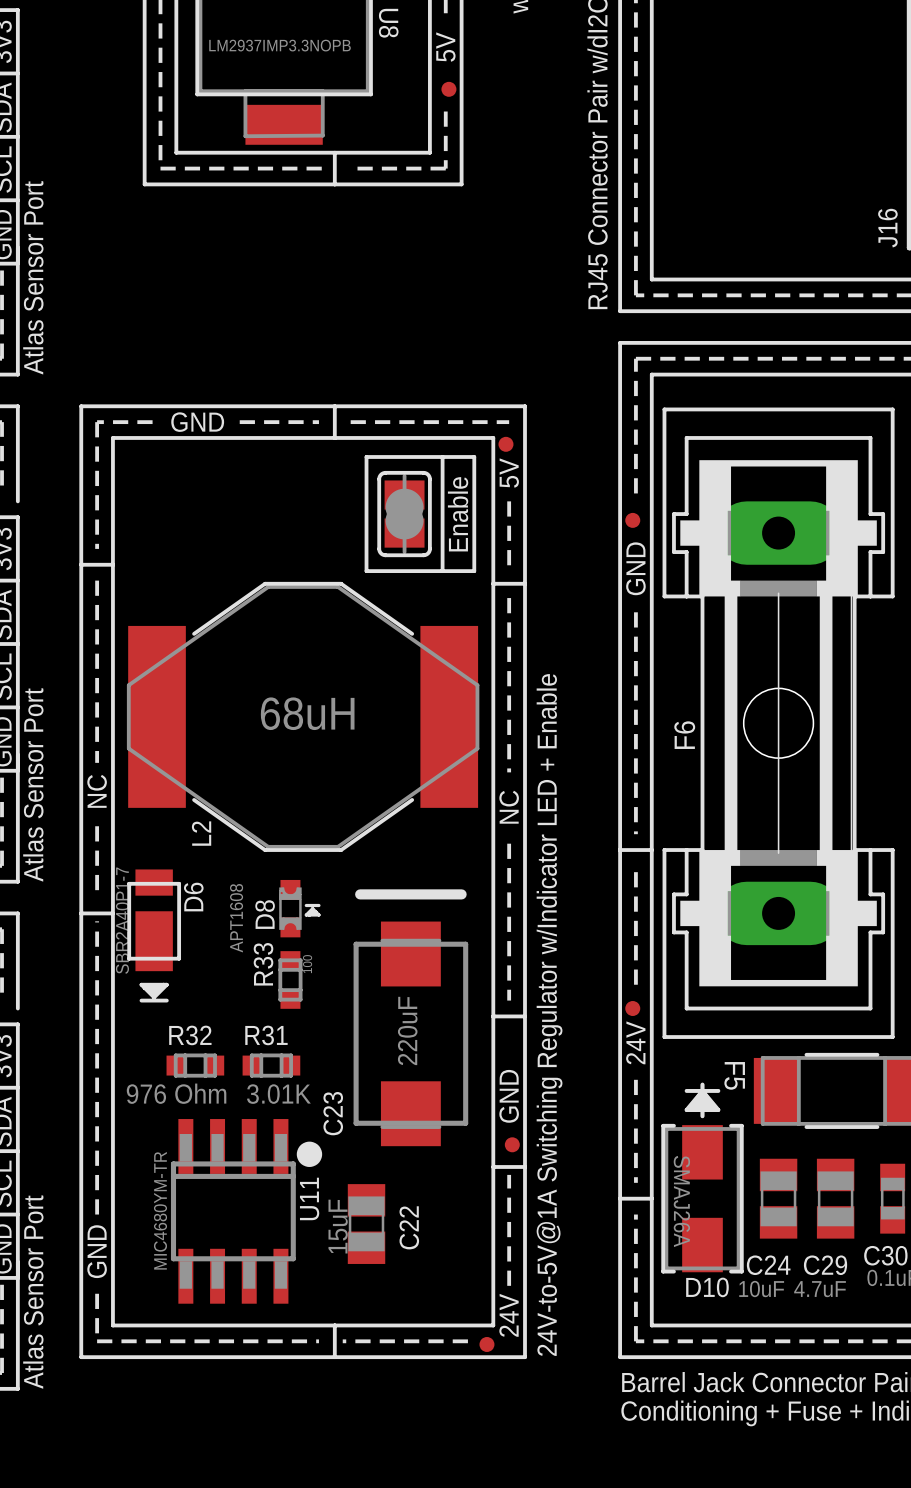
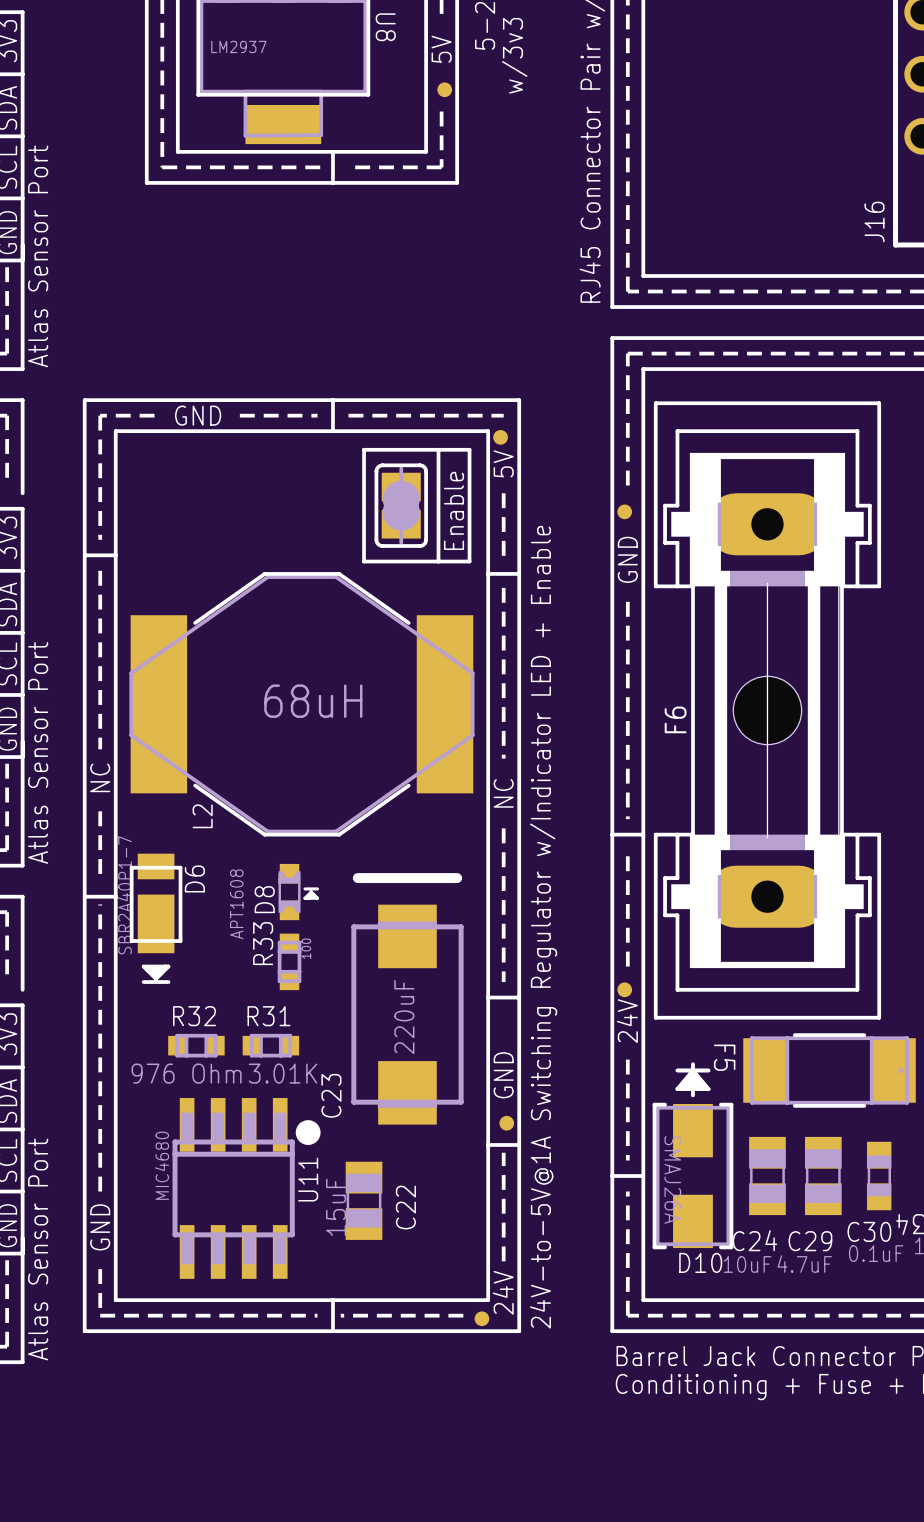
U8 value: LM2937IMP3.3NOPB (280, 45) -> LM2937 (238, 46)
U11 value: MIC4680YM-TR (160, 1210) -> MIC4680 (161, 1165)

